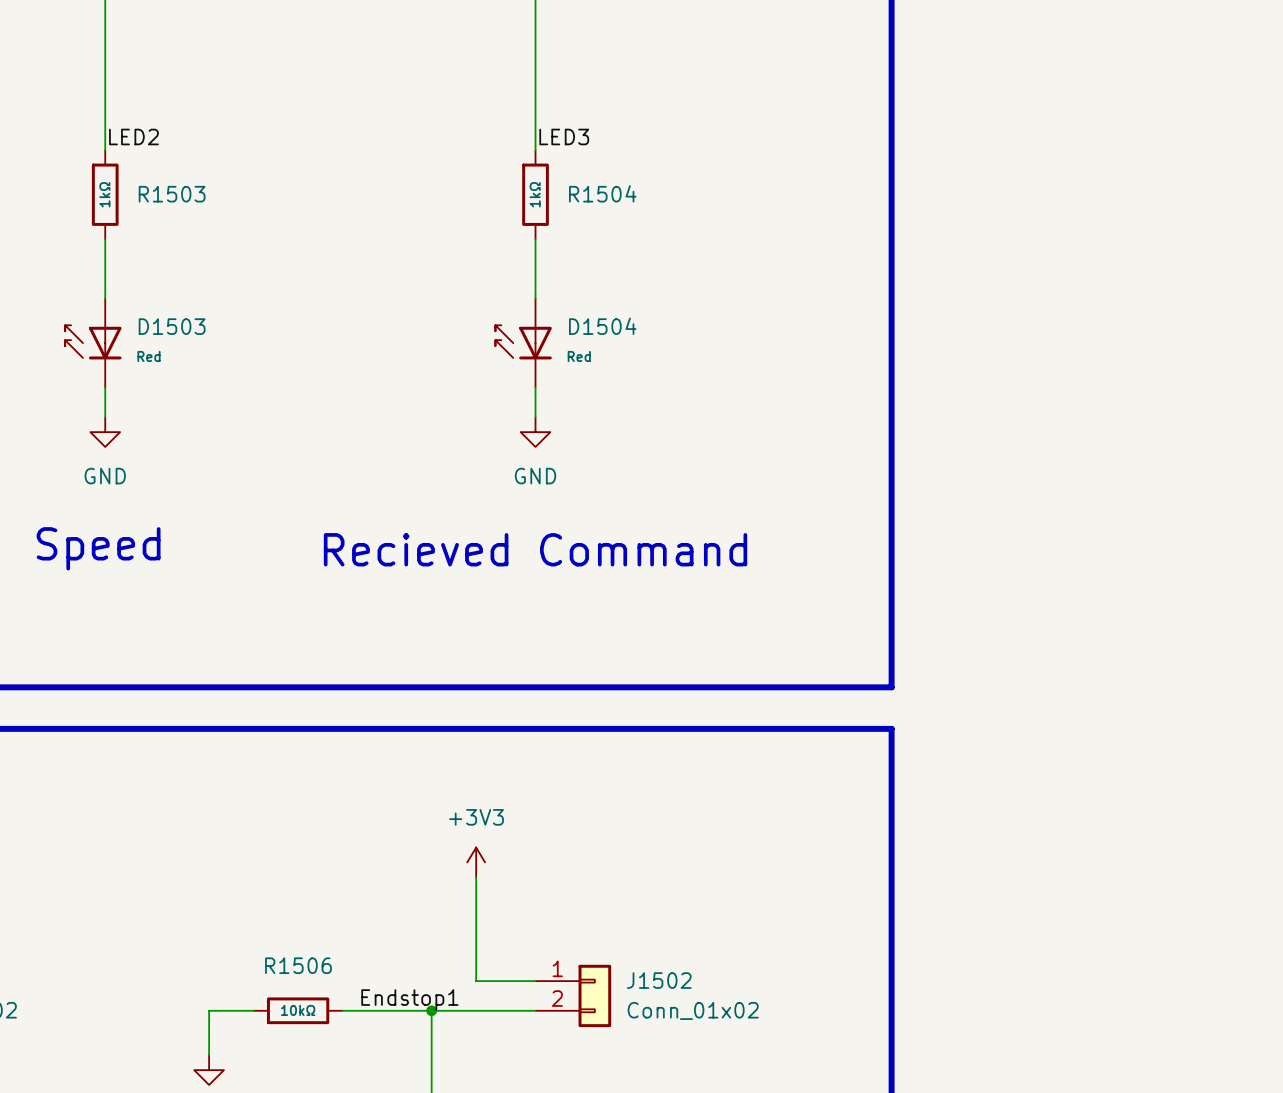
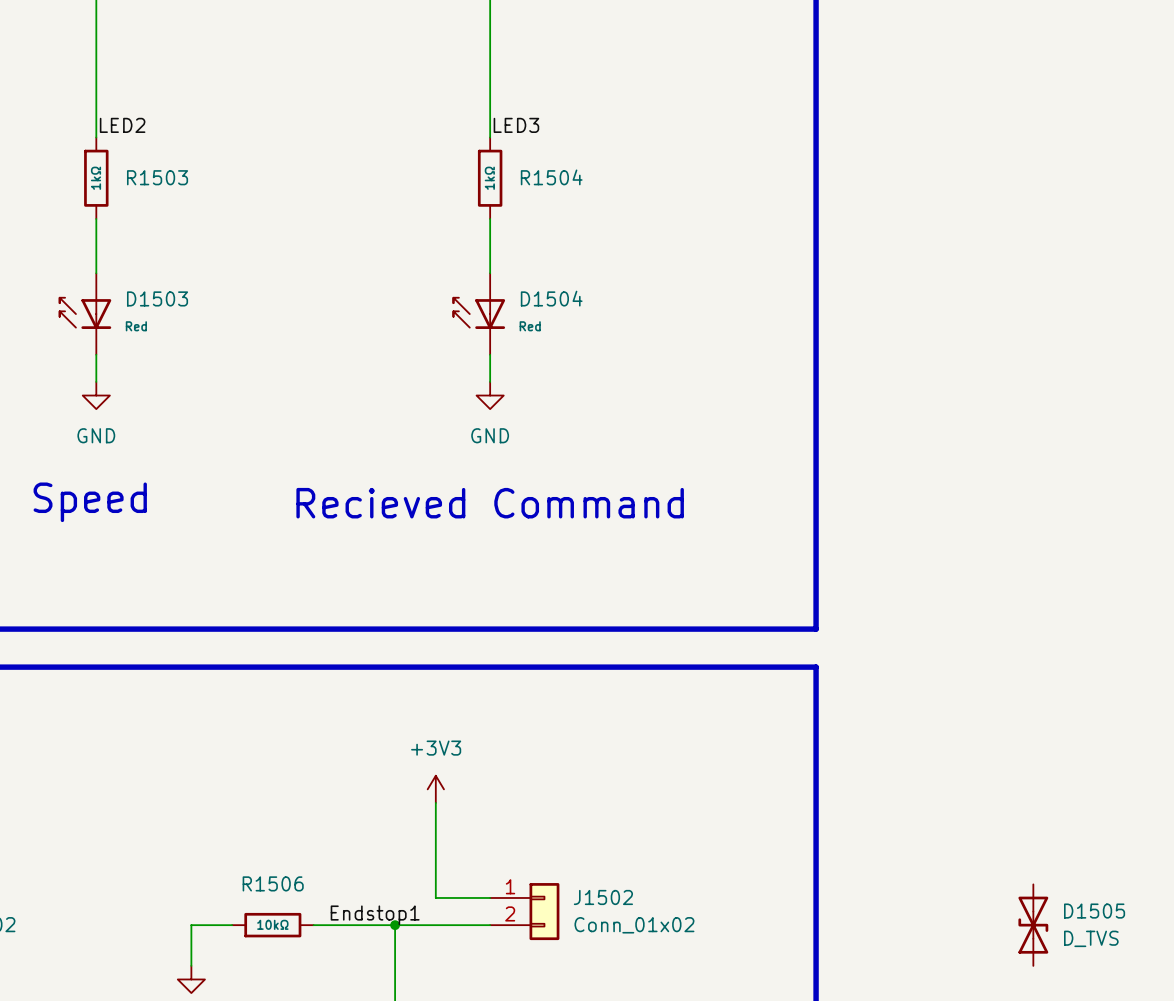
D1505: none -> D_TVS (1033, 925)

